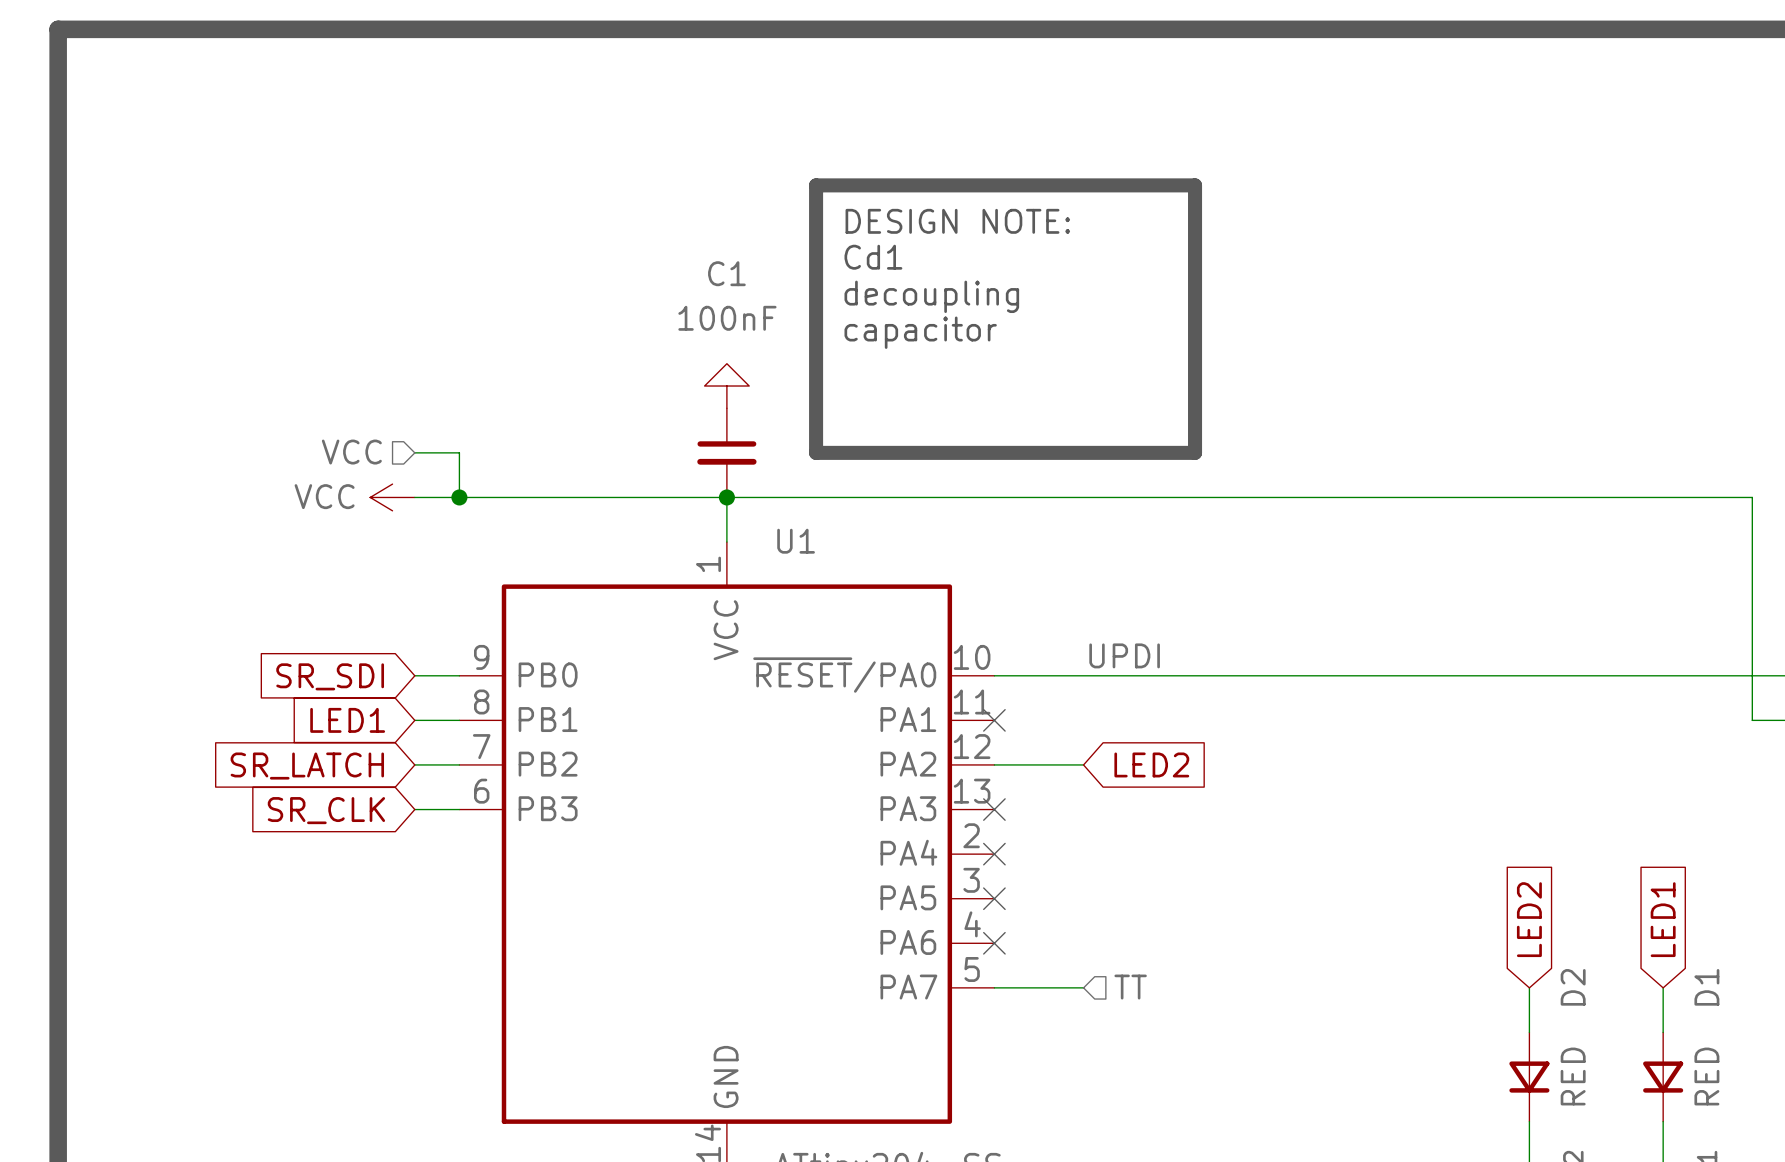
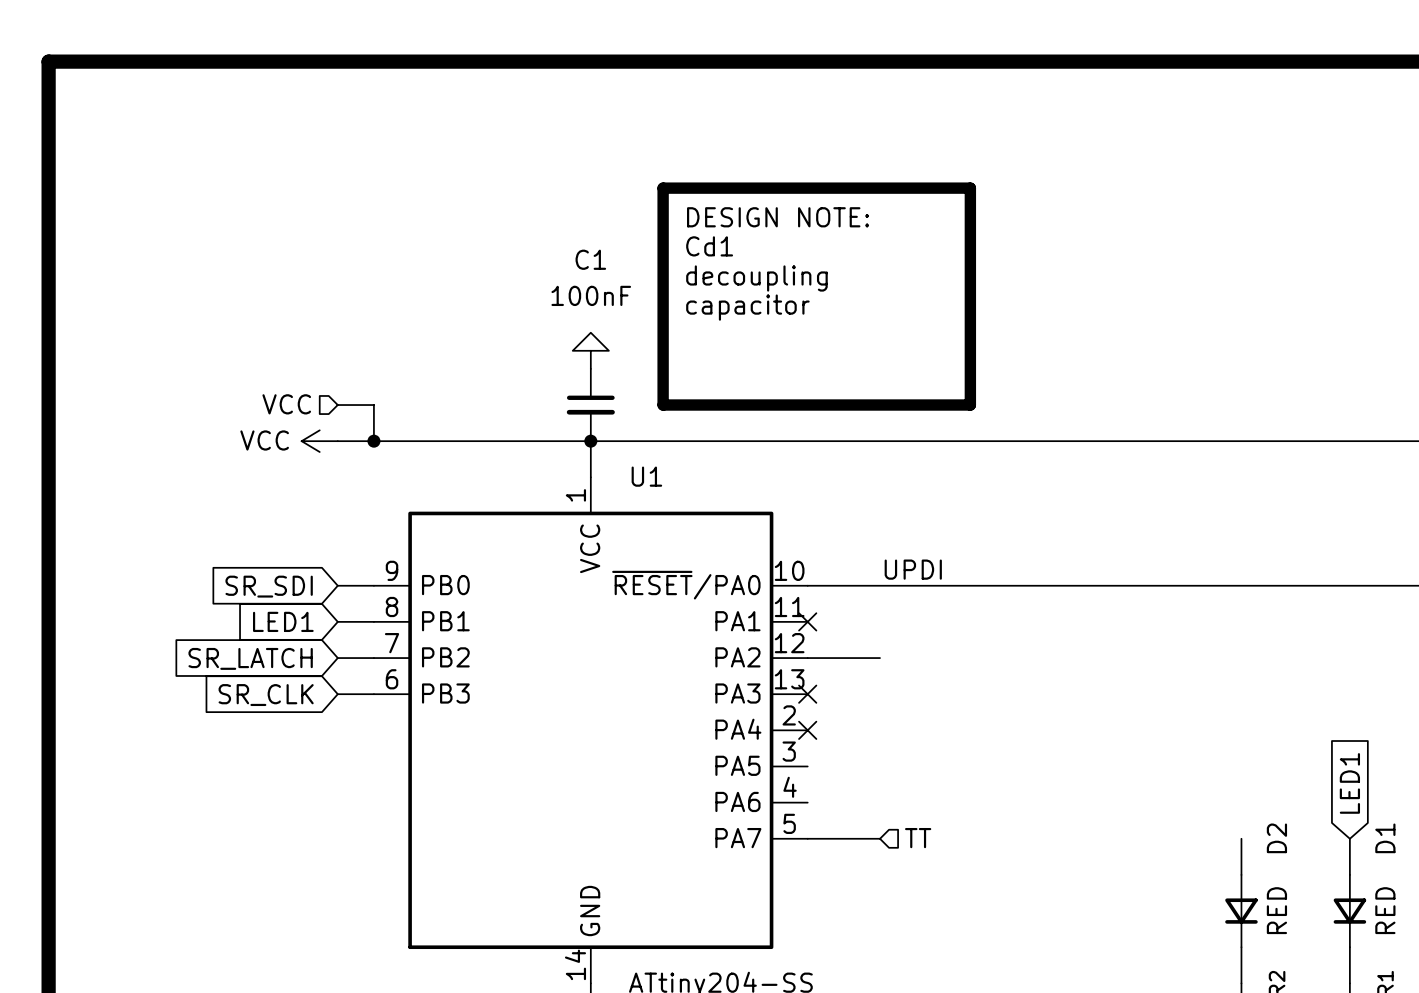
global label: LED2 (1151, 764) -> none
no-connect mark: (994, 898) -> none
global label: LED2 (1529, 919) -> none
no-connect mark: (994, 943) -> none

